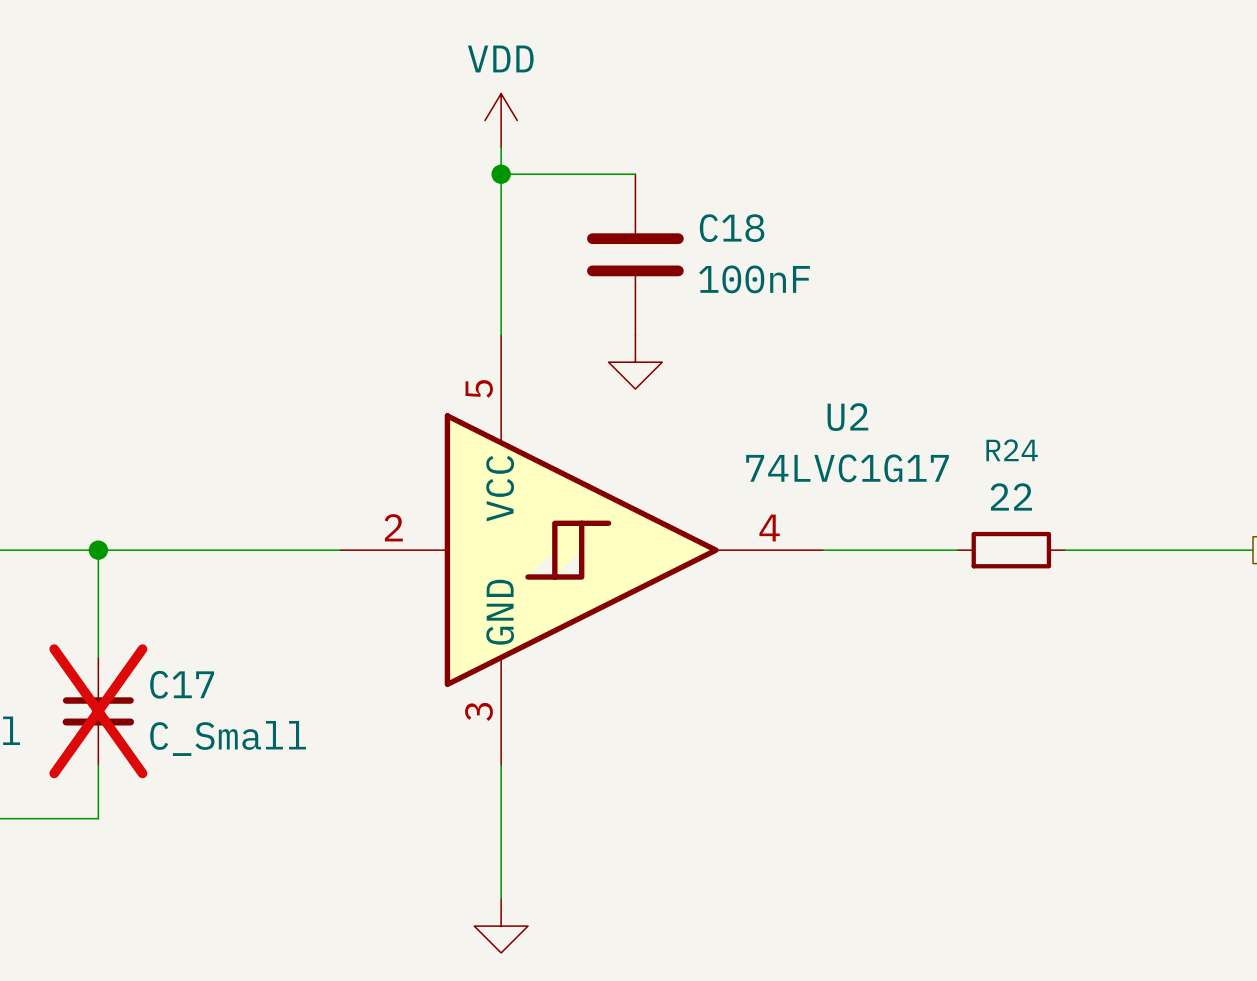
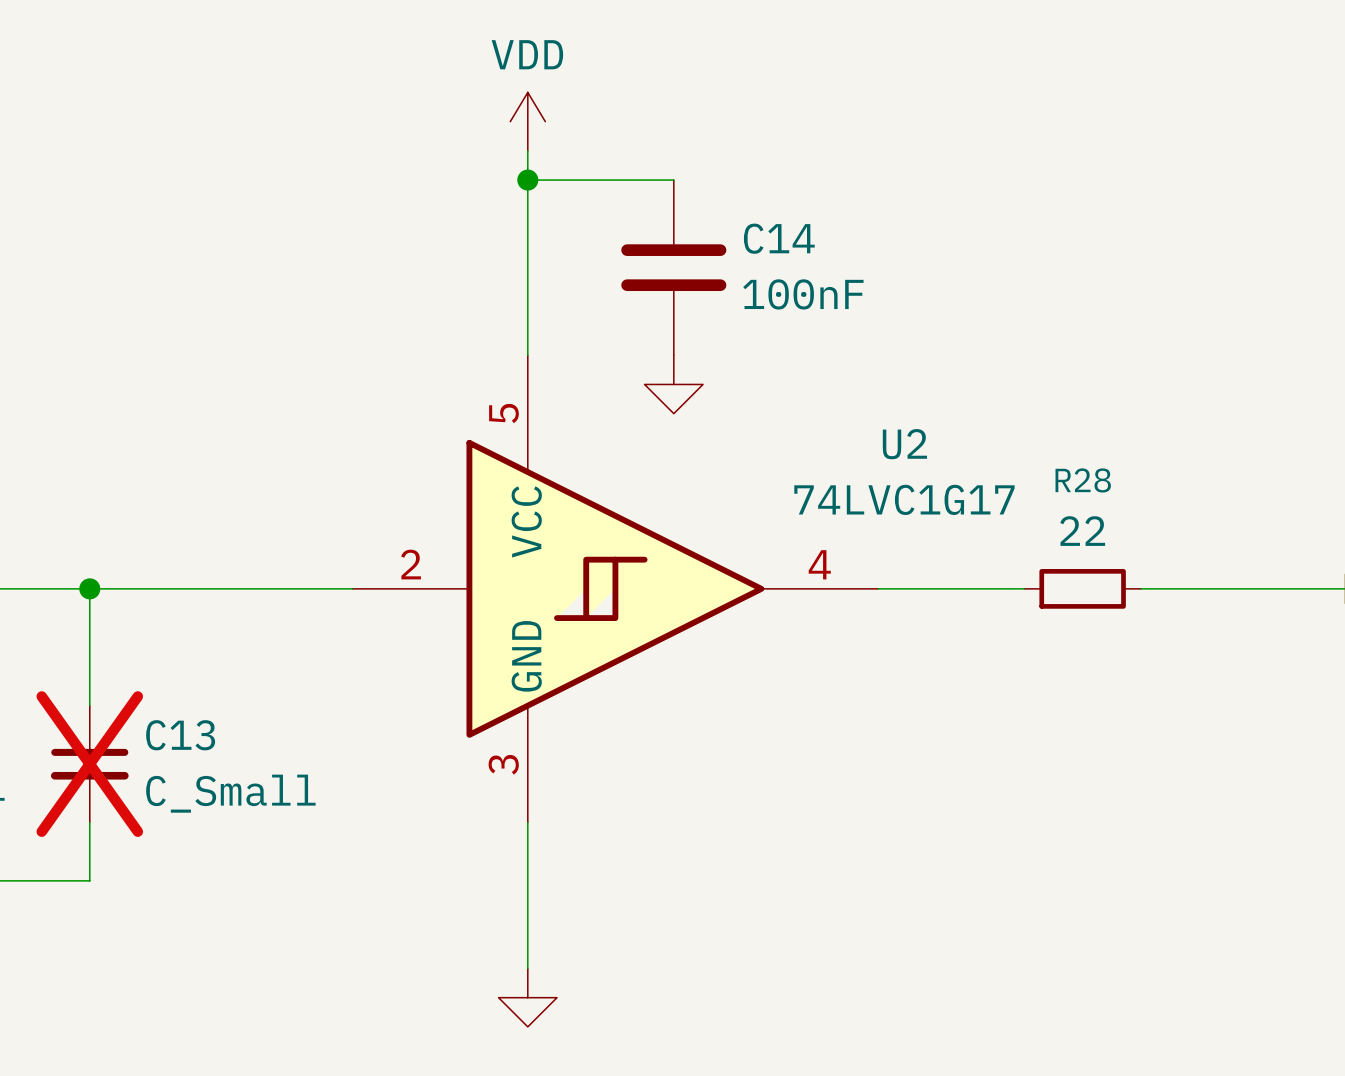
C18 name: C18 (732, 228) -> C14 (779, 238)
R24 name: R24 (1012, 450) -> R28 (1083, 480)
C17 name: C17 (182, 684) -> C13 (180, 735)

